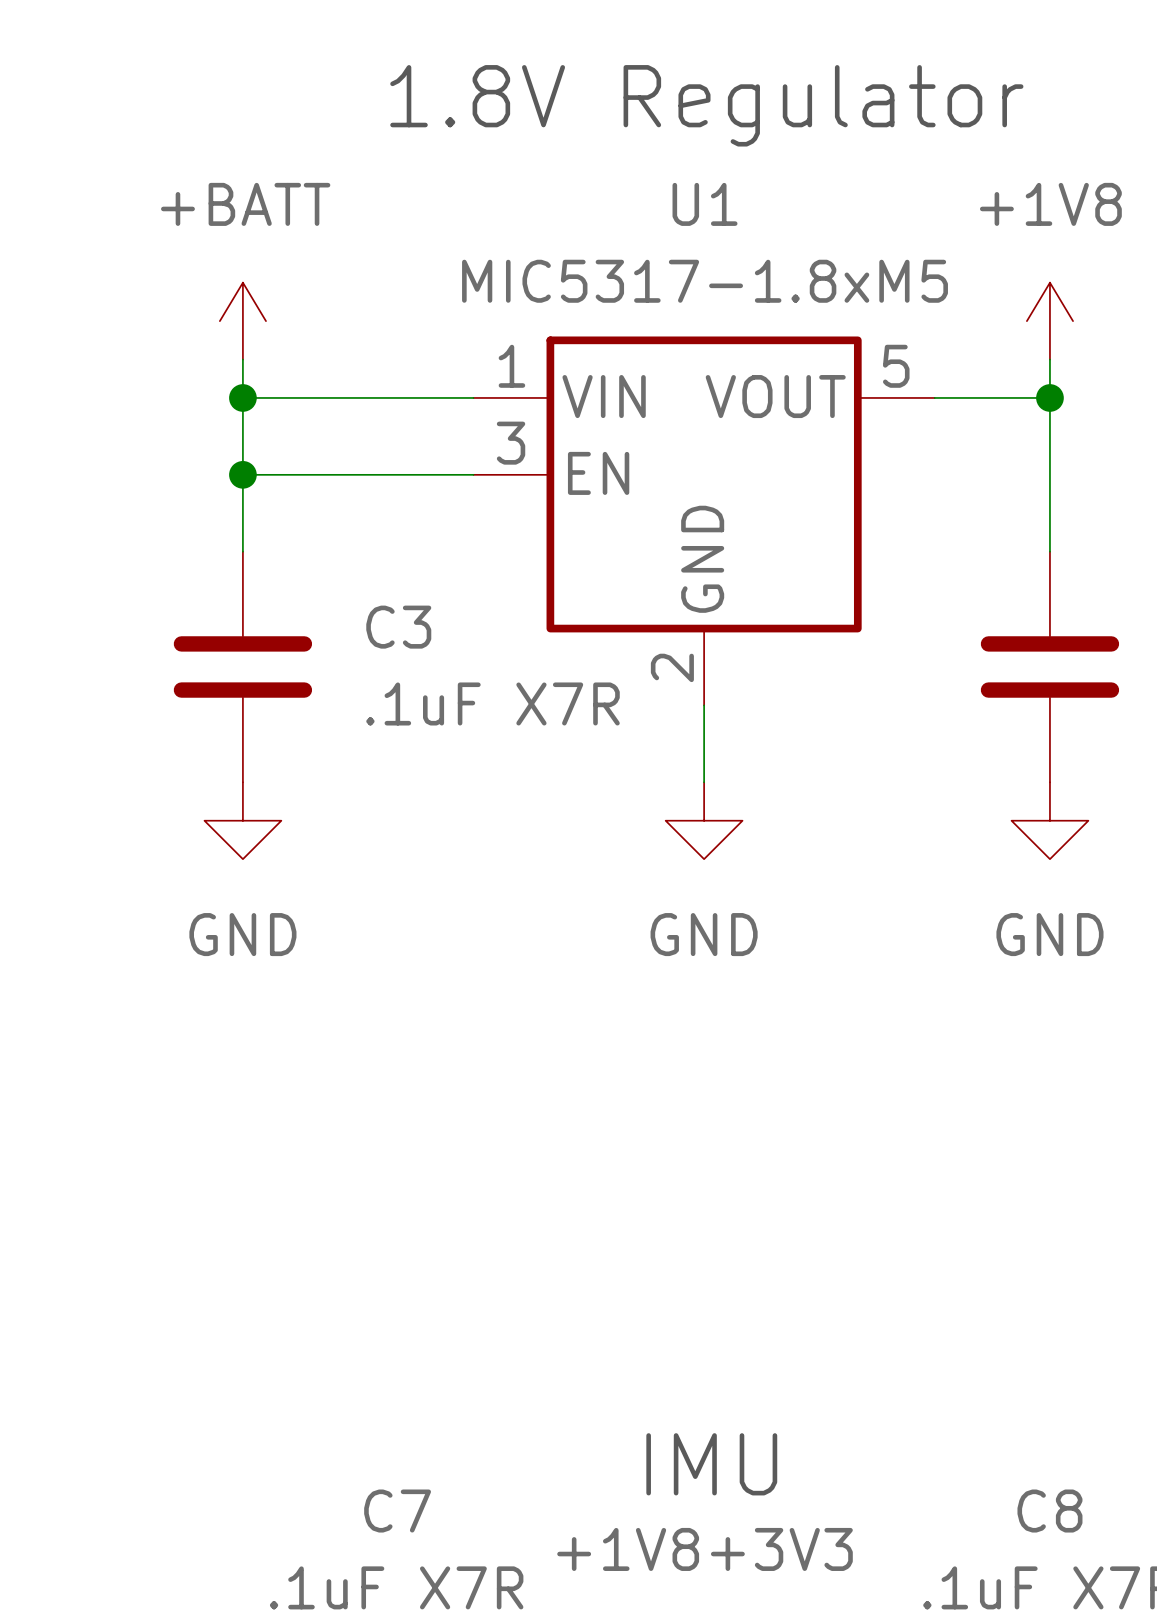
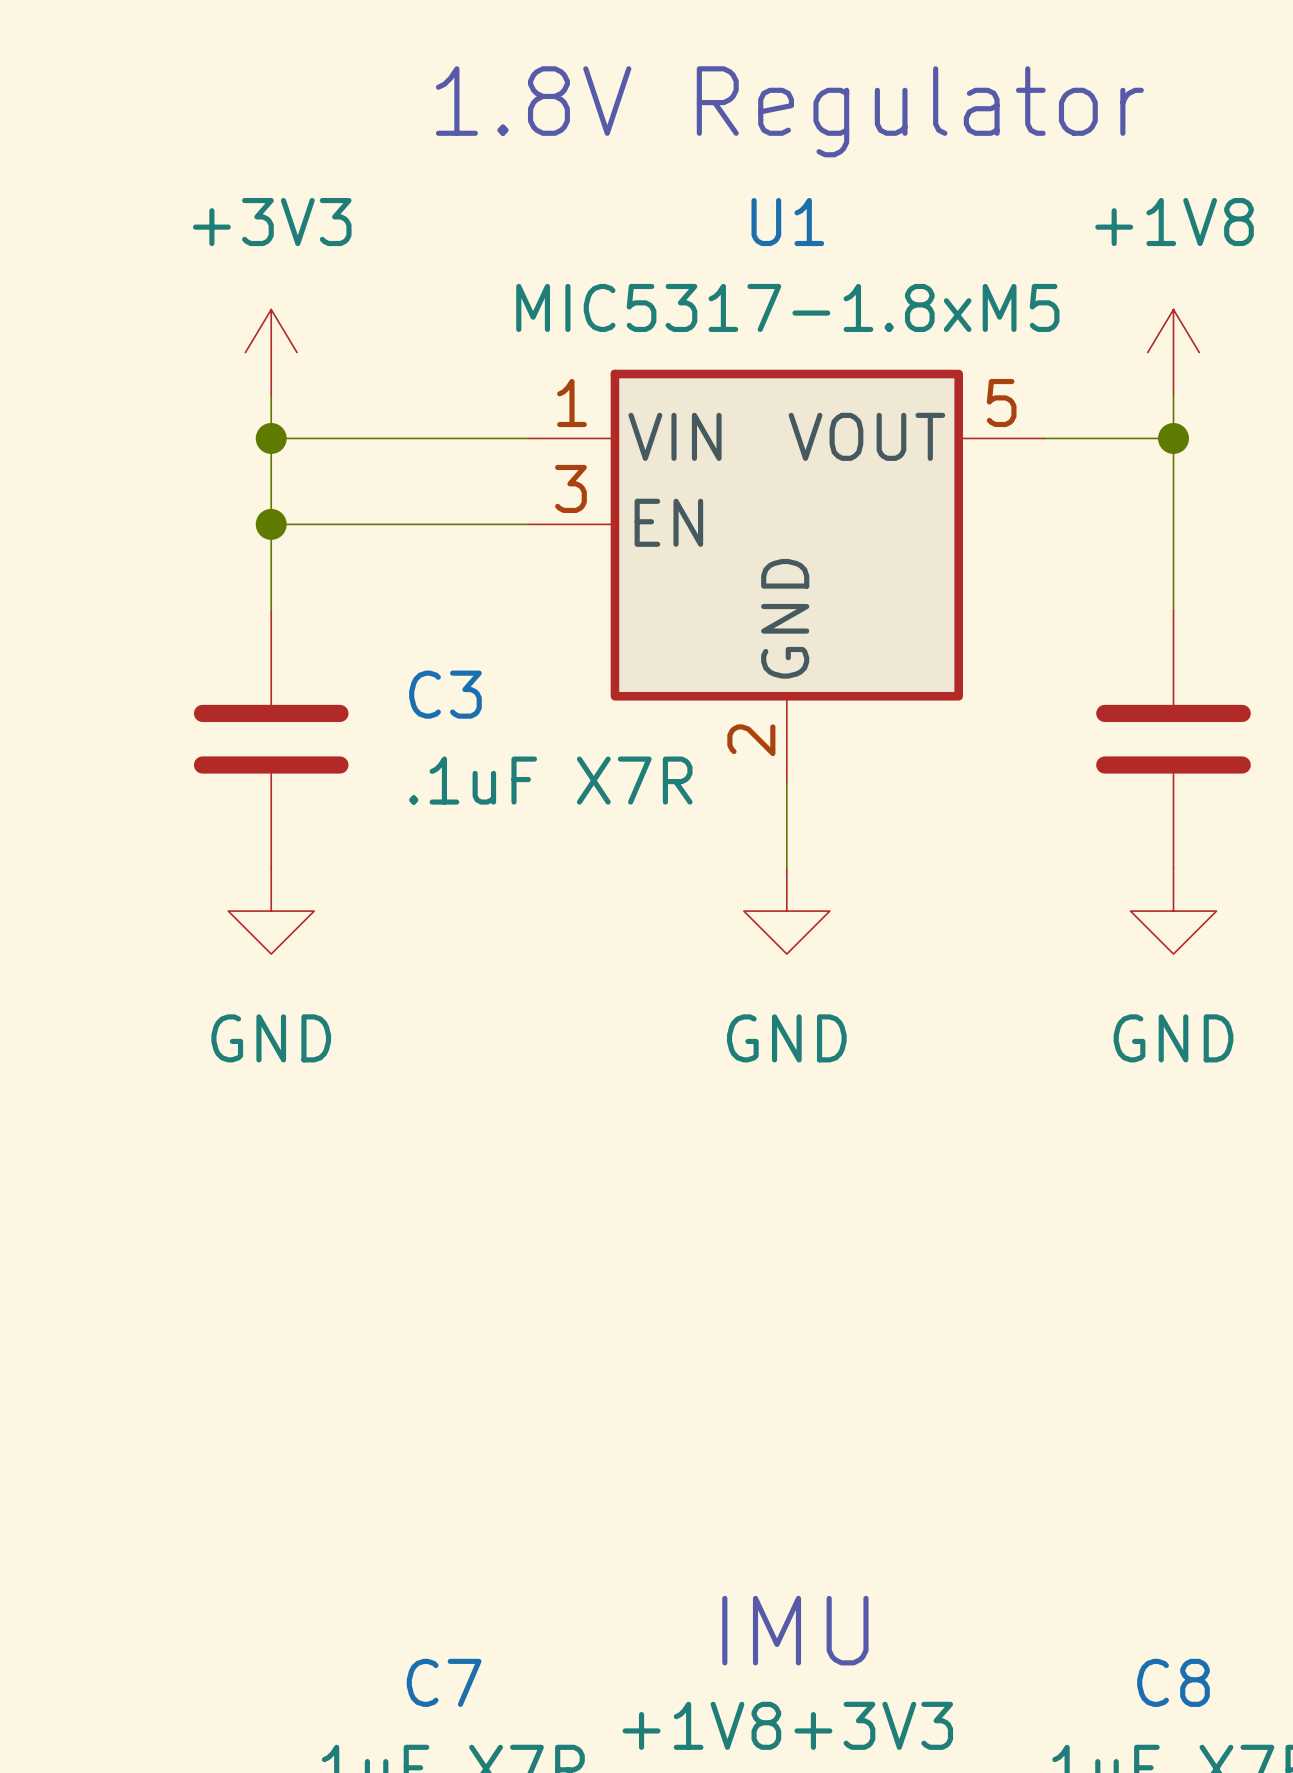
power symbol: +BATT (242, 321) -> +3V3 (271, 352)

